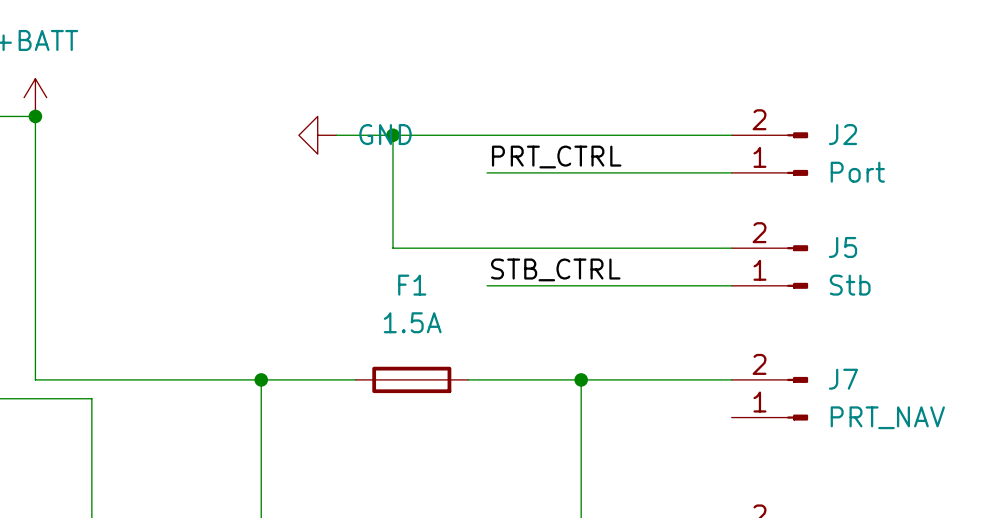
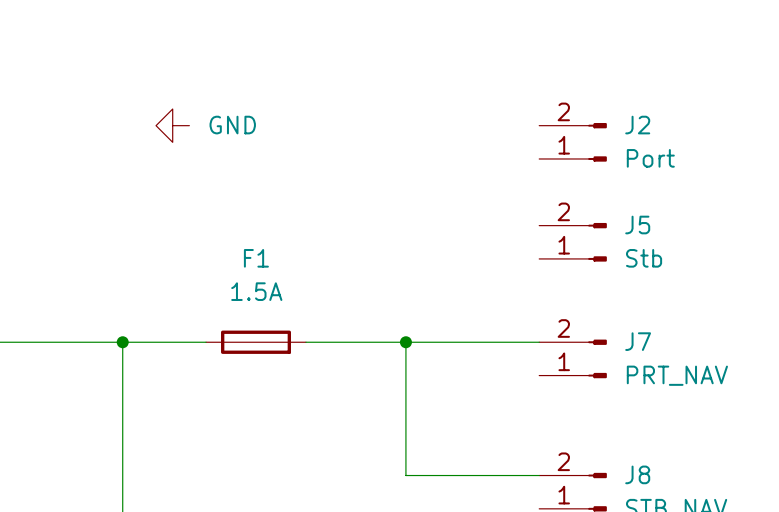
wire: (336, 135) (731, 135) -> none
wire: (392, 135) (392, 248) (731, 248) -> none
junction: (392, 135) -> none
label: PRT_CTRL (556, 157) -> none
wire: (487, 172) (731, 172) -> none
label: STB_CTRL (555, 269) -> none
wire: (487, 285) (731, 285) -> none

